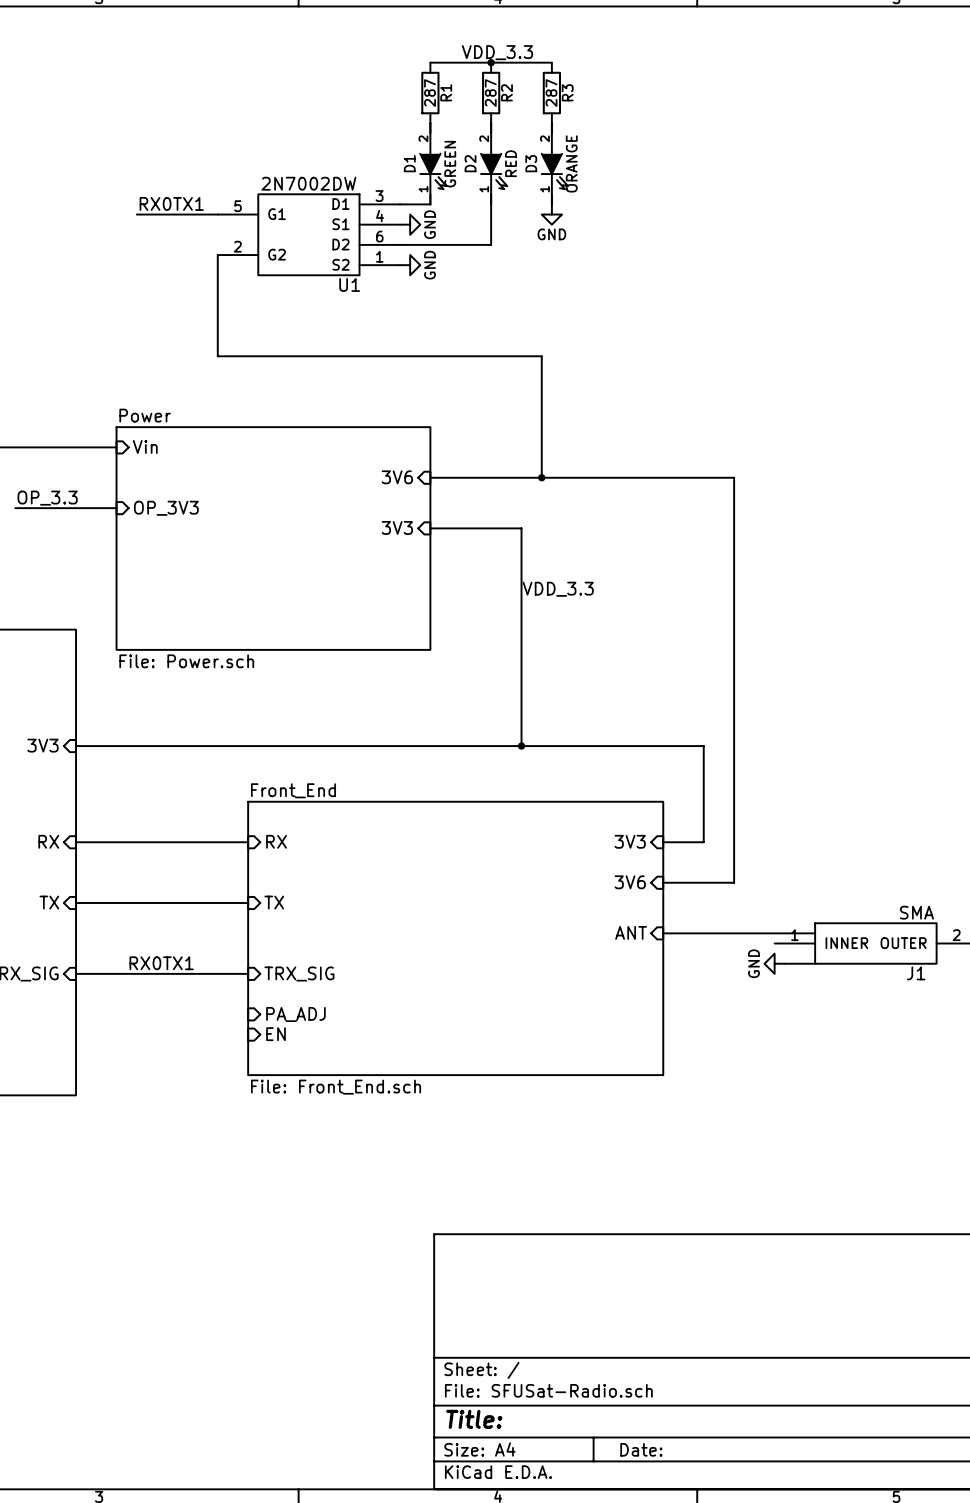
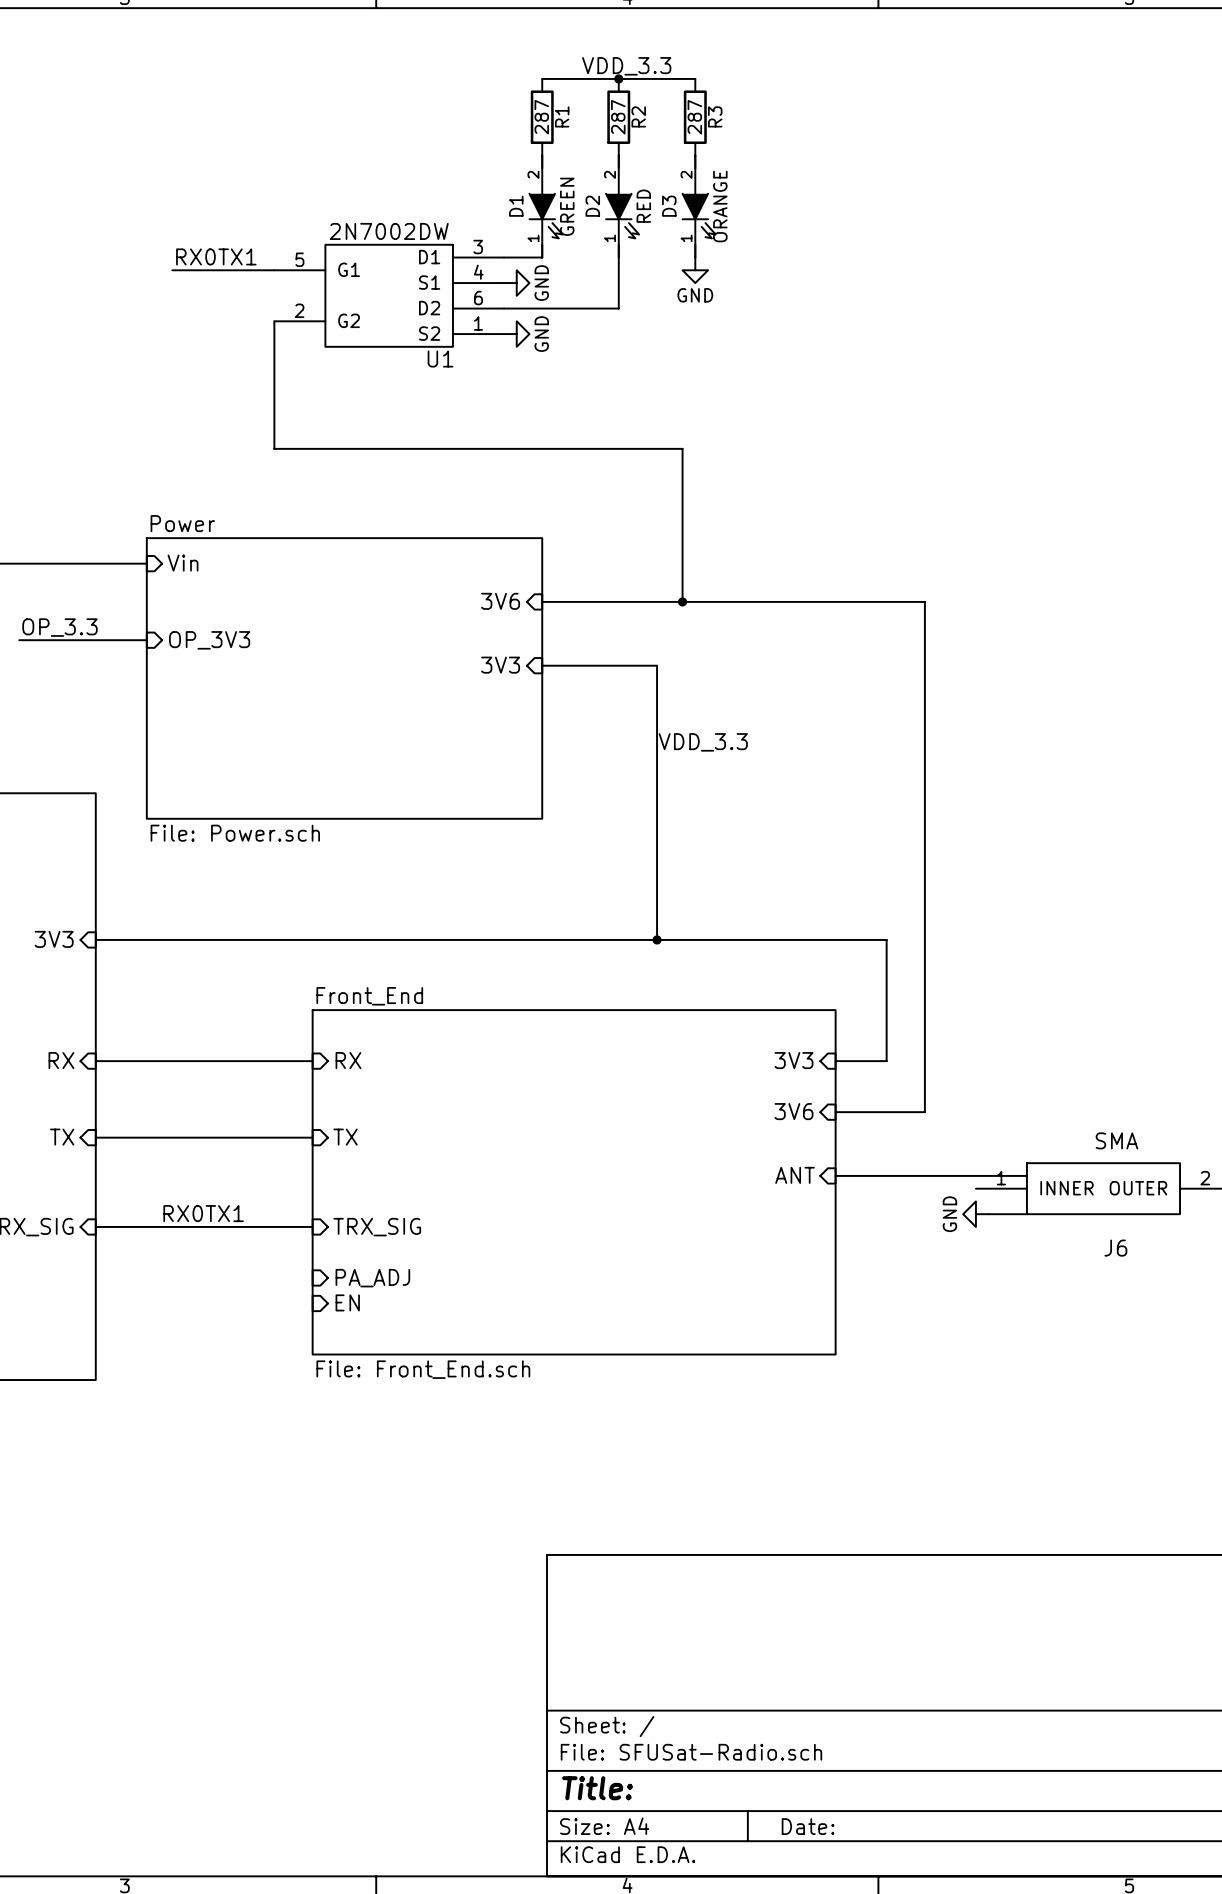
J1 value position: SMA (916, 912) -> SMA (1116, 1140)
J1 name: J1 (916, 973) -> J6 (1115, 1248)

